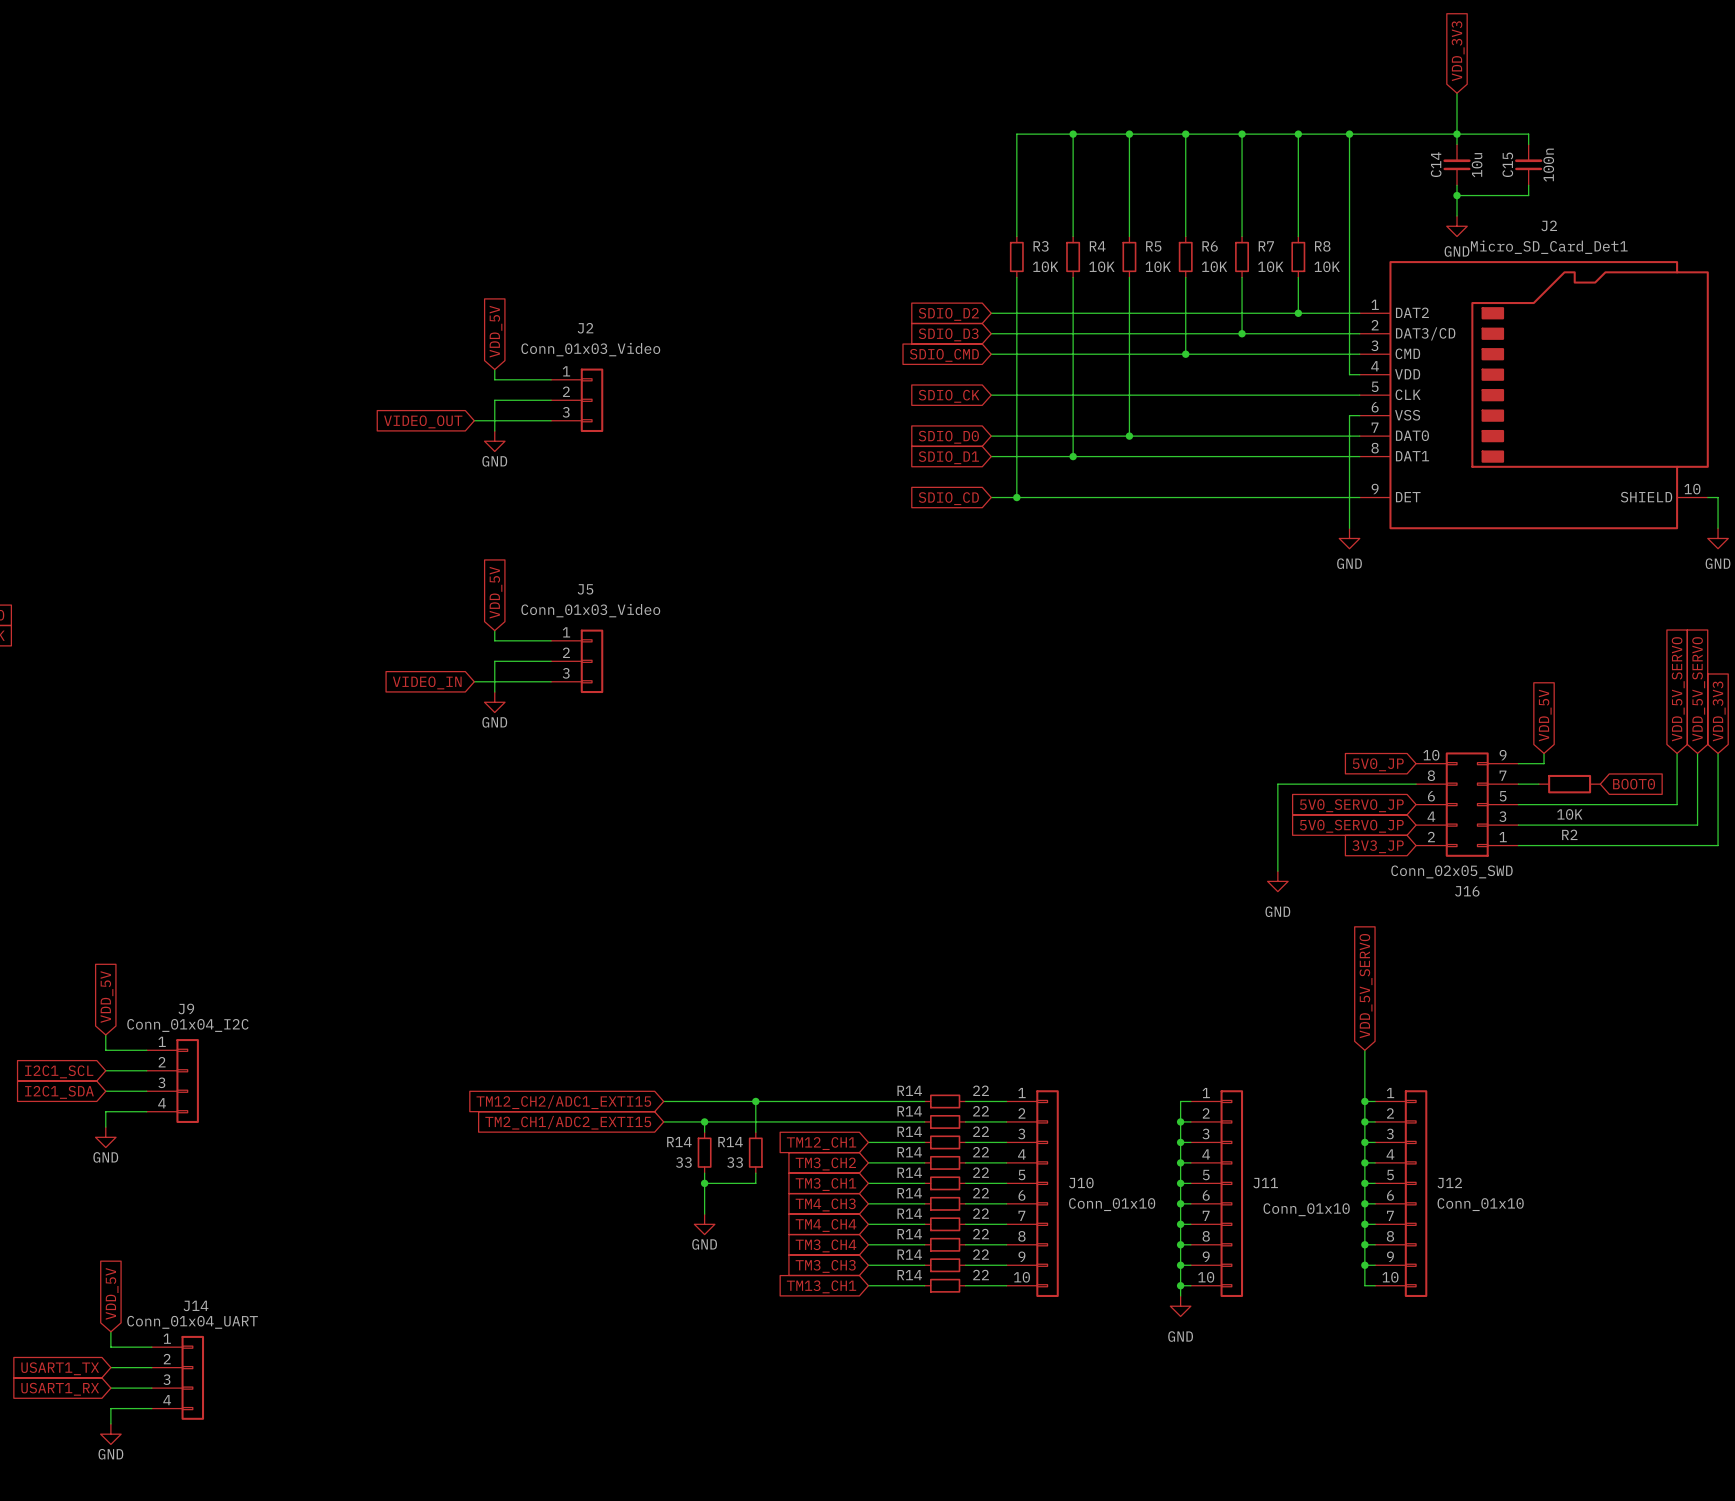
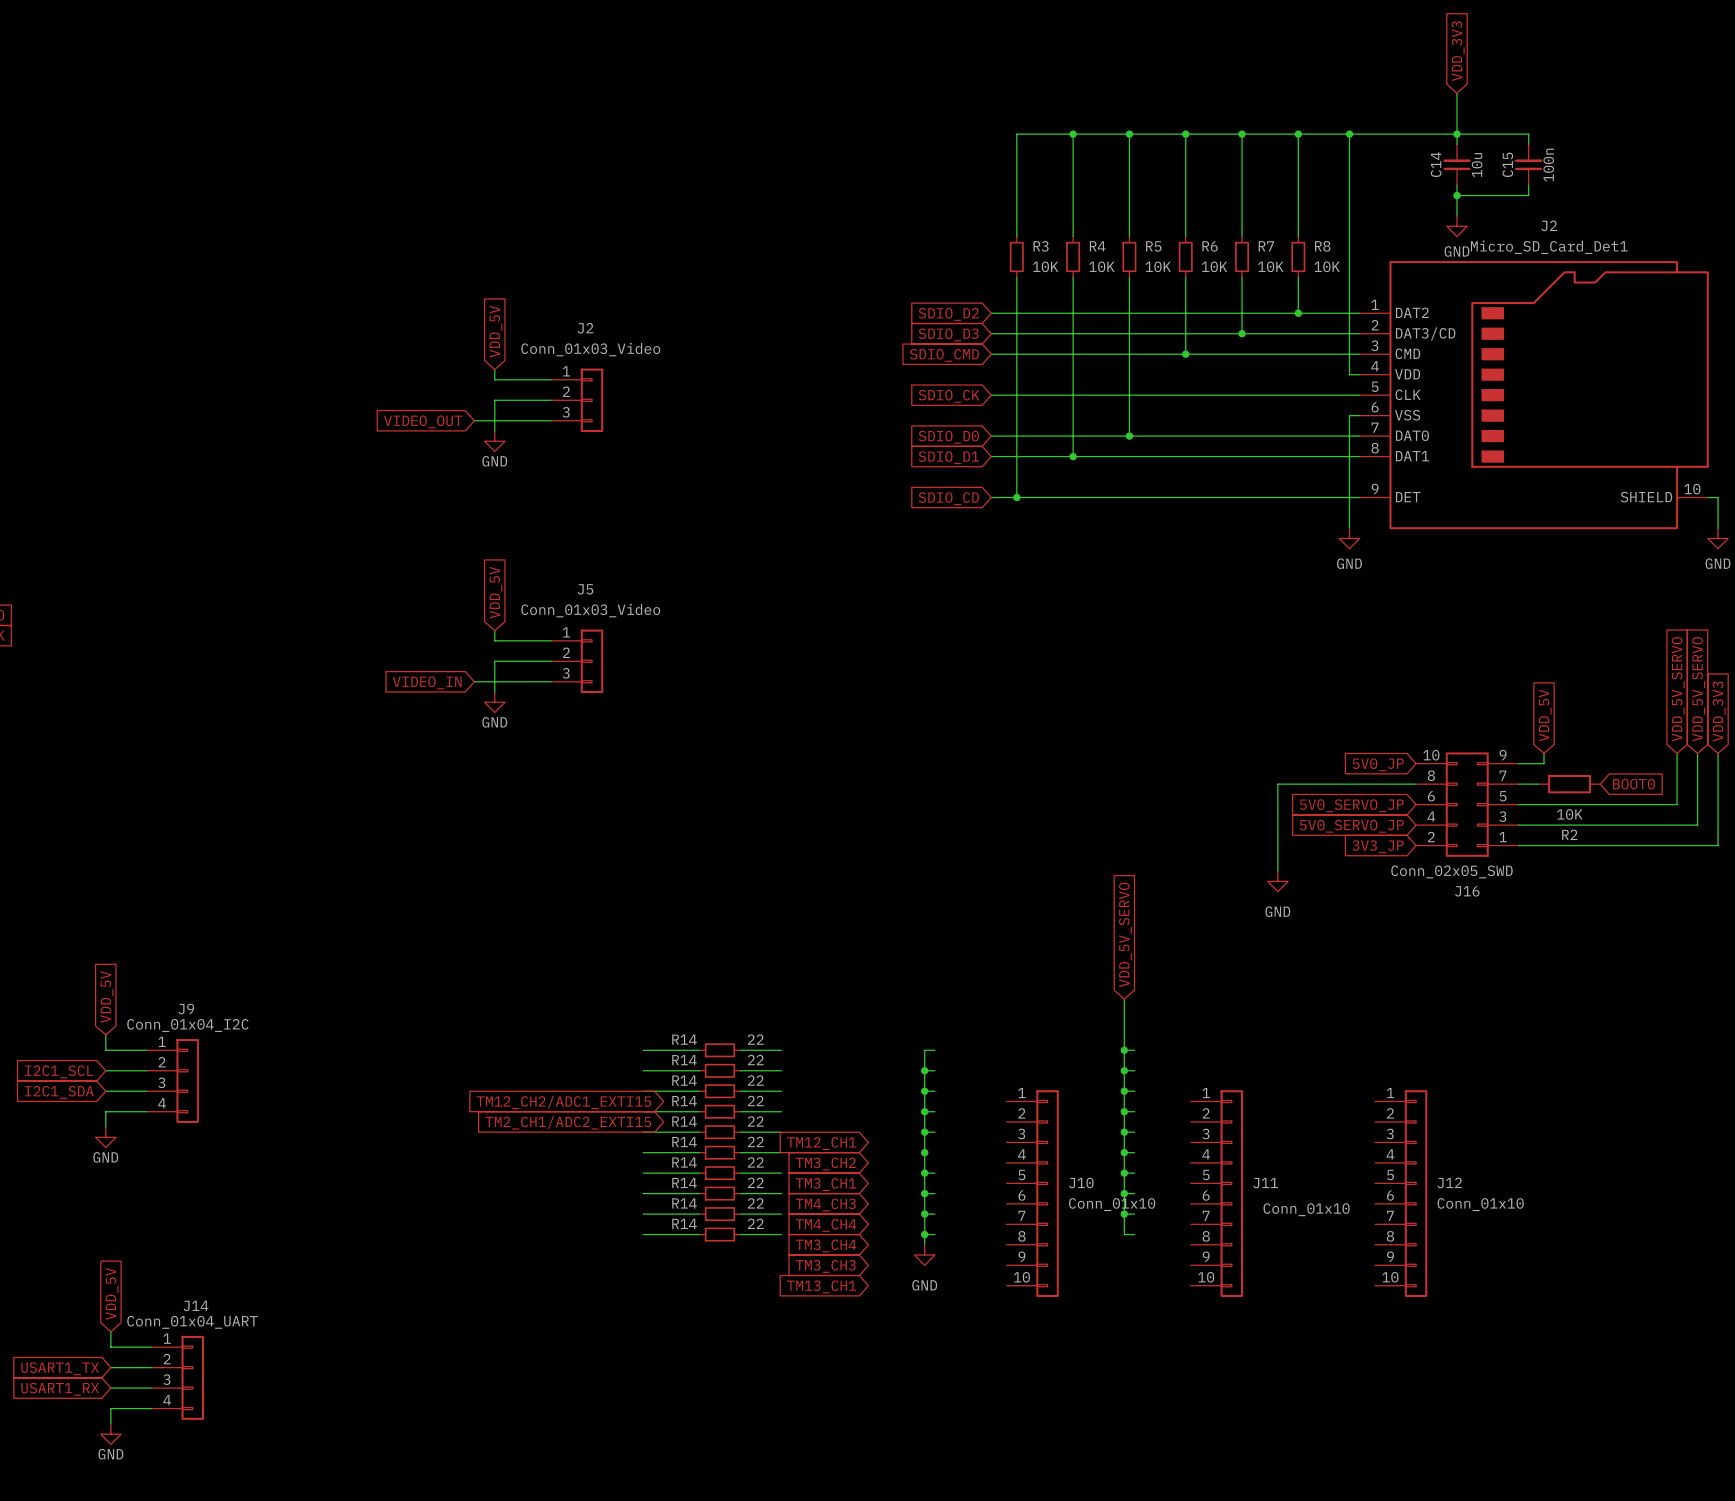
global label: none -> VDD_5V_SERVO (1125, 934)
global label: VDD_5V_SERVO (1366, 986) -> none
wire: none -> (1124, 999) (1124, 1234) (1134, 1234)
wire: none -> (643, 1050) (699, 1050)
R14: none -> 22 (719, 1050)
wire: none -> (740, 1050) (781, 1050)
junction: none -> (1124, 1050)
wire: (1364, 1050) (1364, 1285) (1375, 1285) -> none
wire: none -> (643, 1070) (699, 1070)
R14: none -> 22 (719, 1070)
wire: none -> (740, 1070) (781, 1070)
wire: none -> (924, 1070) (934, 1070)
junction: none -> (924, 1070)
junction: none -> (1124, 1070)
wire: none -> (643, 1091) (699, 1091)
R14: none -> 22 (719, 1091)
wire: none -> (740, 1091) (781, 1091)
wire: none -> (924, 1091) (934, 1091)
junction: none -> (924, 1091)
junction: none -> (1124, 1091)
wire: (663, 1101) (924, 1101) -> none
wire: (755, 1101) (755, 1132) -> none
junction: (755, 1101) -> none
R14: 22 (945, 1101) -> none
wire: (965, 1101) (1006, 1101) -> none
wire: (1190, 1101) (1180, 1101) (1180, 1295) -> none
wire: (1364, 1101) (1375, 1101) -> none
junction: (1364, 1101) -> none
wire: none -> (643, 1111) (699, 1111)
R14: none -> 22 (719, 1111)
wire: none -> (740, 1111) (781, 1111)
wire: none -> (924, 1111) (934, 1111)
junction: none -> (924, 1111)
junction: none -> (1124, 1111)
wire: (663, 1121) (924, 1121) -> none
wire: (704, 1121) (704, 1132) -> none
junction: (704, 1121) -> none
R14: 22 (945, 1121) -> none
wire: (965, 1121) (1006, 1121) -> none
wire: (1180, 1121) (1190, 1121) -> (1124, 1050) (1134, 1050)
junction: (1180, 1121) -> none
wire: (1364, 1121) (1375, 1121) -> none
junction: (1364, 1121) -> none
wire: none -> (643, 1132) (699, 1132)
R14: none -> 22 (719, 1132)
wire: none -> (740, 1132) (781, 1132)
wire: none -> (924, 1132) (934, 1132)
junction: none -> (924, 1132)
junction: none -> (1124, 1132)
wire: (868, 1142) (924, 1142) -> none
R14: 22 (945, 1142) -> none
wire: (965, 1142) (1006, 1142) -> none
wire: (1180, 1142) (1190, 1142) -> (1124, 1070) (1134, 1070)
junction: (1180, 1142) -> none
wire: (1364, 1142) (1375, 1142) -> none
junction: (1364, 1142) -> none
wire: none -> (643, 1152) (699, 1152)
R14: 33 (704, 1152) -> none
R14: none -> 22 (719, 1152)
wire: none -> (740, 1152) (781, 1152)
R14: 33 (755, 1152) -> none
junction: none -> (924, 1152)
junction: none -> (1124, 1152)
wire: (868, 1162) (924, 1162) -> none
R14: 22 (945, 1162) -> none
wire: (965, 1162) (1006, 1162) -> none
wire: (1180, 1162) (1190, 1162) -> (1124, 1091) (1134, 1091)
junction: (1180, 1162) -> none
wire: (1364, 1162) (1375, 1162) -> none
junction: (1364, 1162) -> none
wire: none -> (643, 1173) (699, 1173)
wire: (704, 1173) (704, 1214) -> none
R14: none -> 22 (719, 1173)
wire: none -> (740, 1173) (781, 1173)
wire: (755, 1173) (755, 1183) (704, 1183) -> none
wire: none -> (924, 1173) (934, 1173)
junction: none -> (924, 1173)
junction: none -> (1124, 1173)
junction: (704, 1183) -> none
wire: (868, 1183) (924, 1183) -> none
R14: 22 (945, 1183) -> none
wire: (965, 1183) (1006, 1183) -> none
wire: (1180, 1183) (1190, 1183) -> (1124, 1111) (1134, 1111)
junction: (1180, 1183) -> none
wire: (1364, 1183) (1375, 1183) -> none
junction: (1364, 1183) -> none
wire: none -> (643, 1193) (699, 1193)
R14: none -> 22 (719, 1193)
wire: none -> (740, 1193) (781, 1193)
wire: none -> (924, 1193) (934, 1193)
junction: none -> (924, 1193)
junction: none -> (1124, 1193)
wire: (868, 1203) (924, 1203) -> none
R14: 22 (945, 1203) -> none
wire: (965, 1203) (1006, 1203) -> none
wire: (1180, 1203) (1190, 1203) -> (1124, 1132) (1134, 1132)
junction: (1180, 1203) -> none
wire: (1364, 1203) (1375, 1203) -> none
junction: (1364, 1203) -> none
wire: none -> (643, 1214) (699, 1214)
R14: none -> 22 (719, 1214)
wire: none -> (740, 1214) (781, 1214)
wire: none -> (924, 1214) (934, 1214)
junction: none -> (924, 1214)
junction: none -> (1124, 1214)
power symbol: GND (704, 1224) -> none
wire: (868, 1224) (924, 1224) -> none
R14: 22 (945, 1224) -> none
wire: (965, 1224) (1006, 1224) -> none
wire: (1180, 1224) (1190, 1224) -> (1124, 1152) (1134, 1152)
junction: (1180, 1224) -> none
wire: (1364, 1224) (1375, 1224) -> none
junction: (1364, 1224) -> none
wire: none -> (643, 1234) (699, 1234)
R14: none -> 22 (719, 1234)
wire: none -> (740, 1234) (781, 1234)
wire: none -> (924, 1234) (934, 1234)
junction: none -> (924, 1234)
wire: (868, 1244) (924, 1244) -> (934, 1050) (924, 1050) (924, 1244)
R14: 22 (945, 1244) -> none
wire: (965, 1244) (1006, 1244) -> none
wire: (1180, 1244) (1190, 1244) -> (1124, 1173) (1134, 1173)
junction: (1180, 1244) -> none
wire: (1364, 1244) (1375, 1244) -> none
junction: (1364, 1244) -> none
power symbol: none -> GND (924, 1255)
wire: (868, 1265) (924, 1265) -> none
R14: 22 (945, 1265) -> none
wire: (965, 1265) (1006, 1265) -> none
wire: (1180, 1265) (1190, 1265) -> (1124, 1193) (1134, 1193)
junction: (1180, 1265) -> none
wire: (1364, 1265) (1375, 1265) -> none
junction: (1364, 1265) -> none
wire: (868, 1285) (924, 1285) -> none
R14: 22 (945, 1285) -> none
wire: (965, 1285) (1006, 1285) -> none
wire: (1180, 1285) (1190, 1285) -> (1124, 1214) (1134, 1214)
junction: (1180, 1285) -> none
power symbol: GND (1180, 1306) -> none

